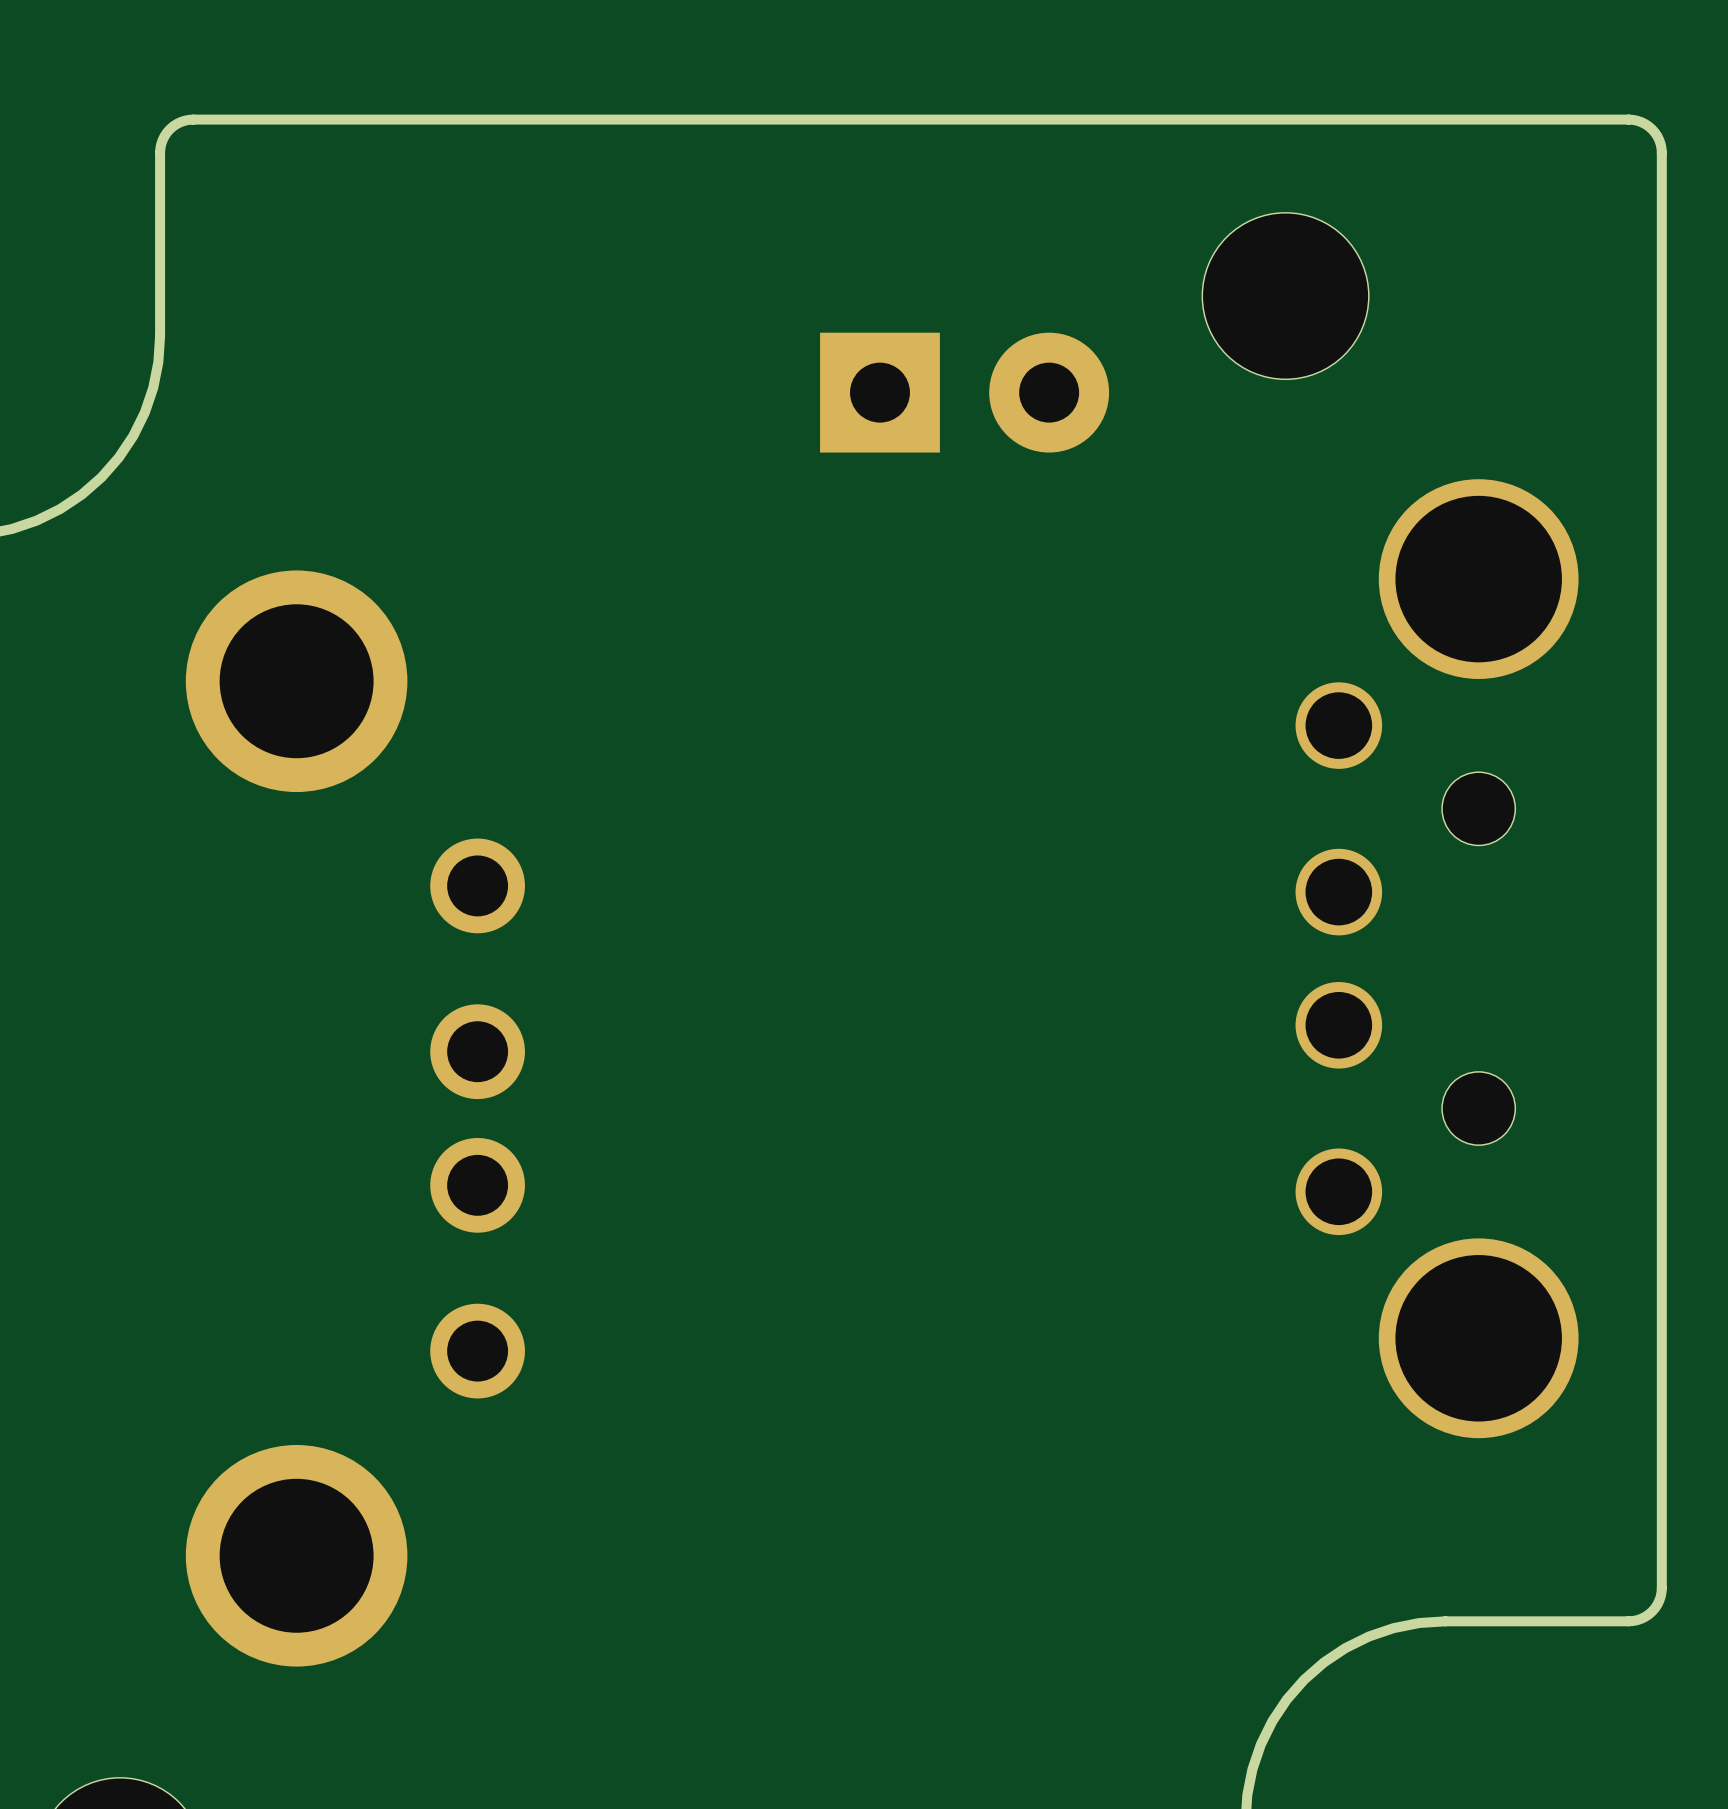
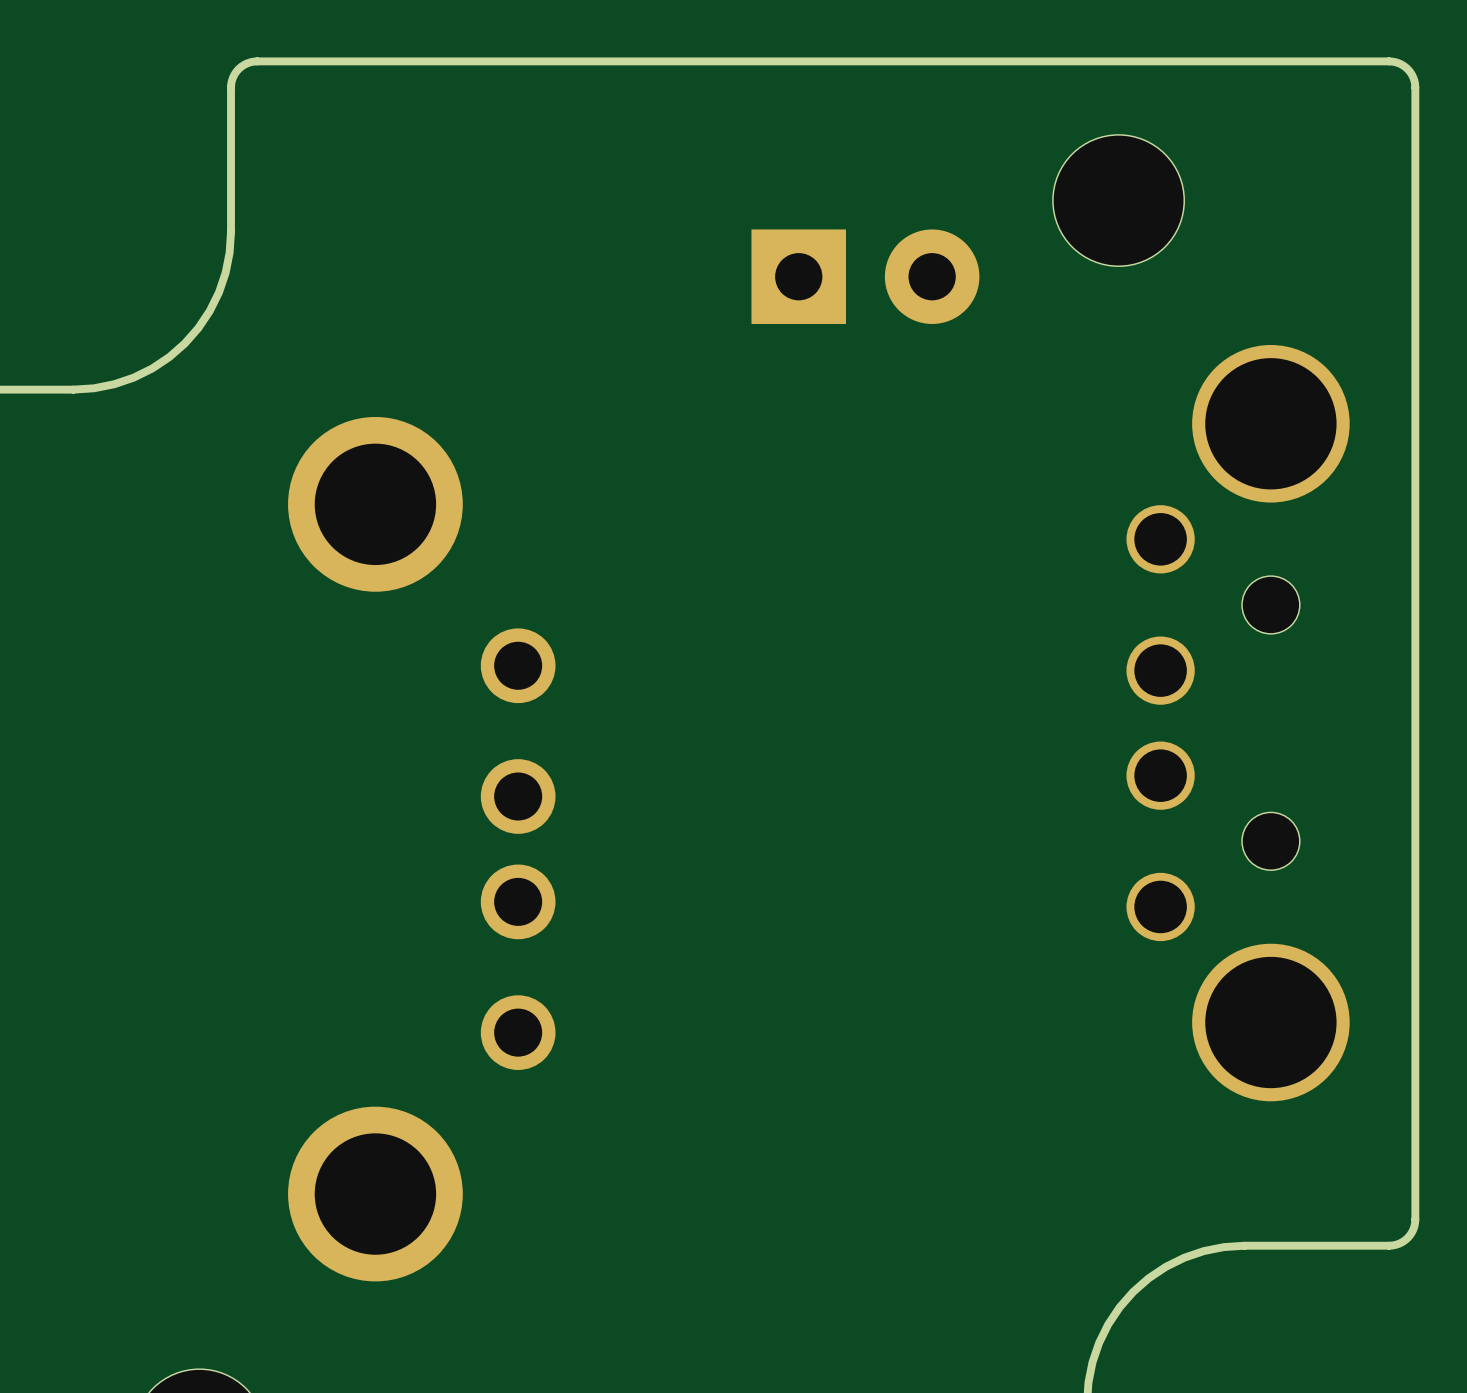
part position: (355, 1118) -> (421, 849)

